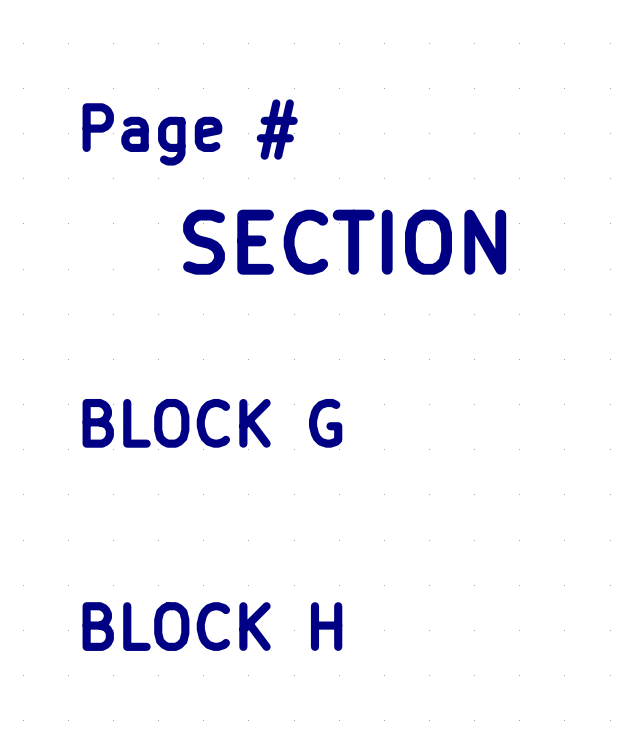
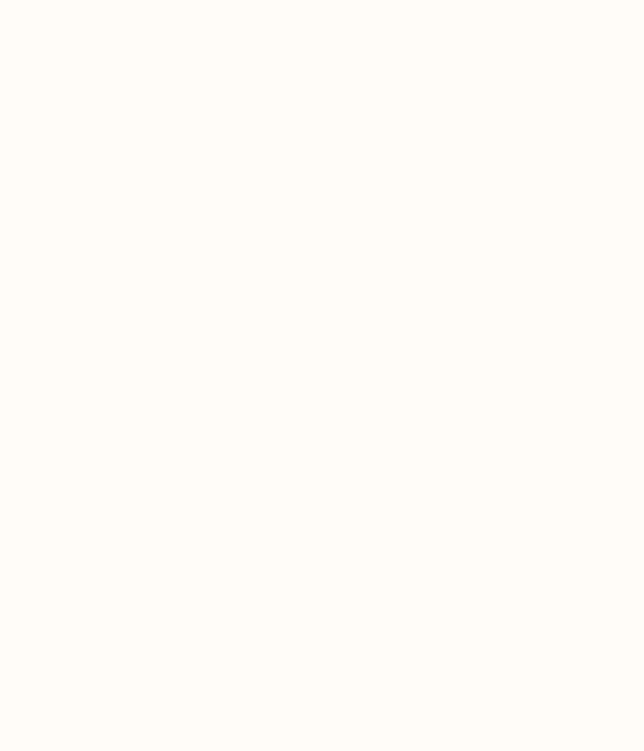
text: Page # (190, 132) -> none
text: SECTION (344, 242) -> none
text: BLOCK G (212, 423) -> none
text: BLOCK H (212, 626) -> none

